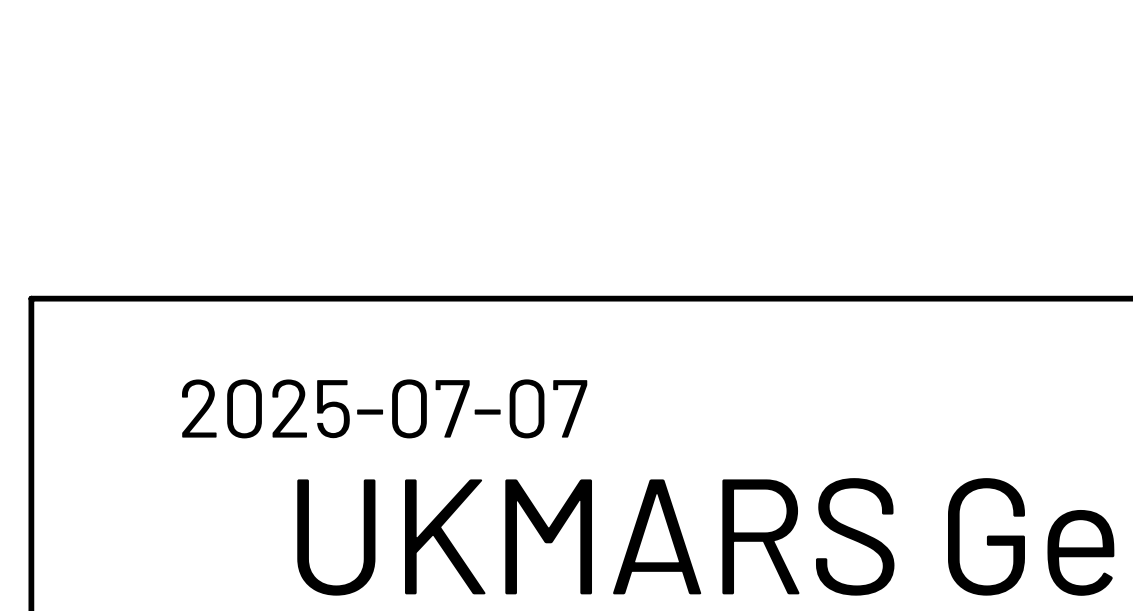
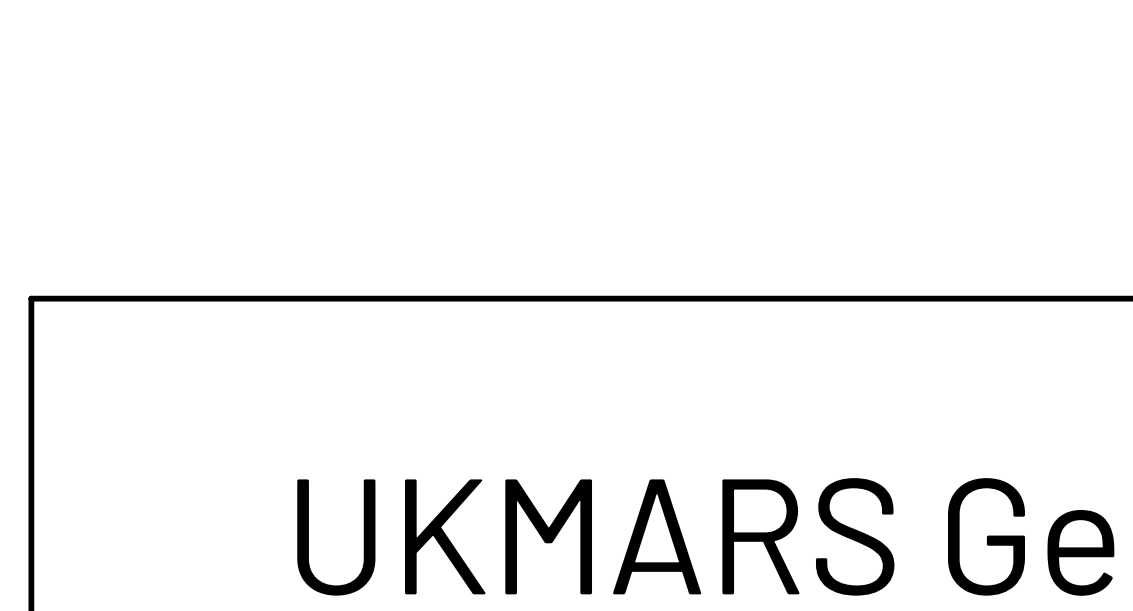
text: 2025-07-07 (384, 408) -> none

